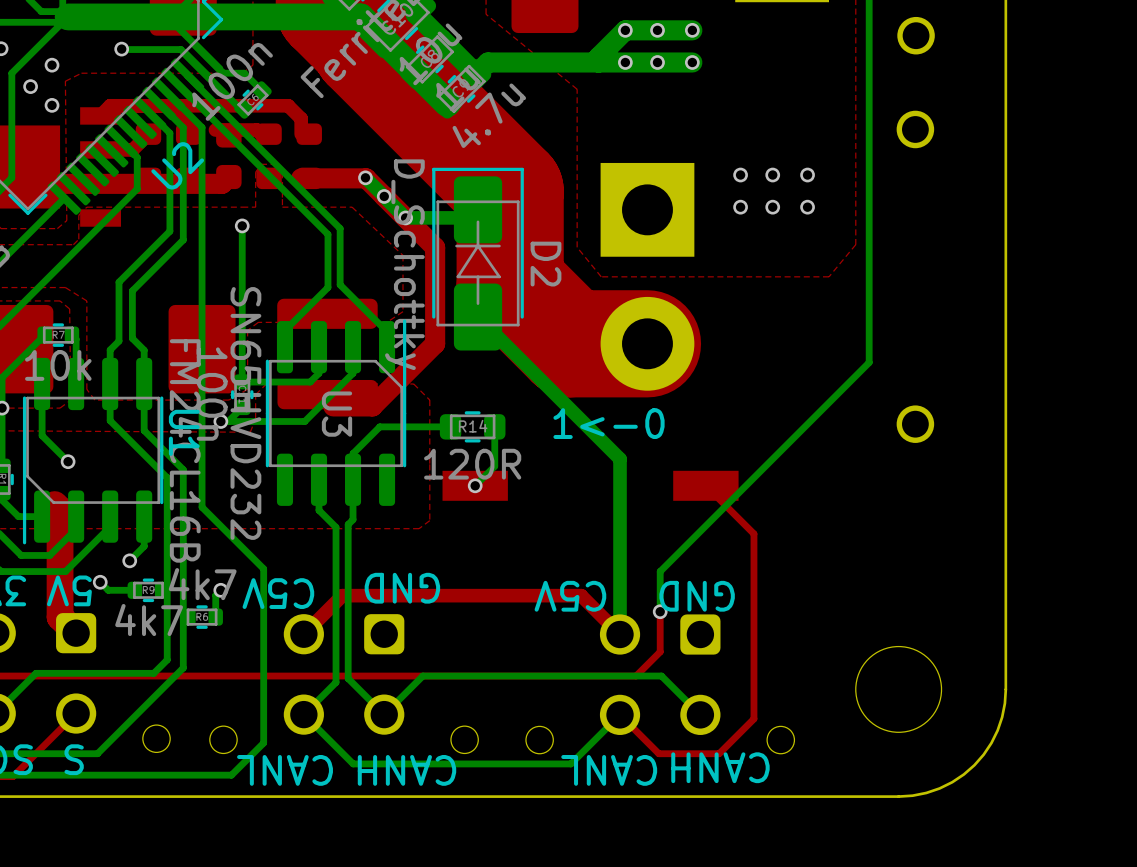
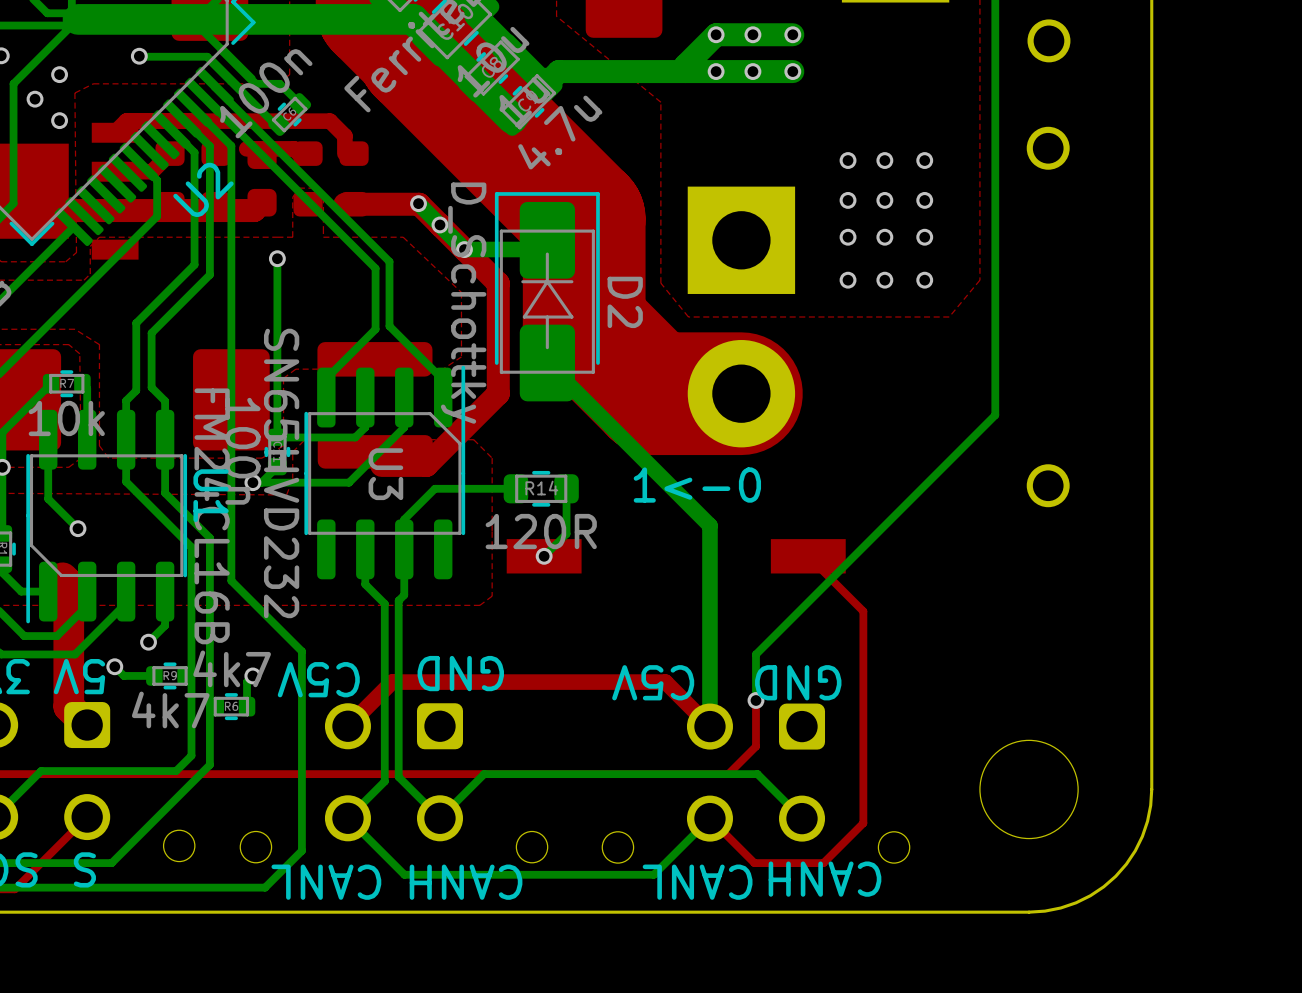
via: none -> (848, 160)
via: none -> (884, 160)
via: none -> (924, 160)
via: none -> (848, 280)
via: none -> (884, 280)
via: none -> (924, 280)

